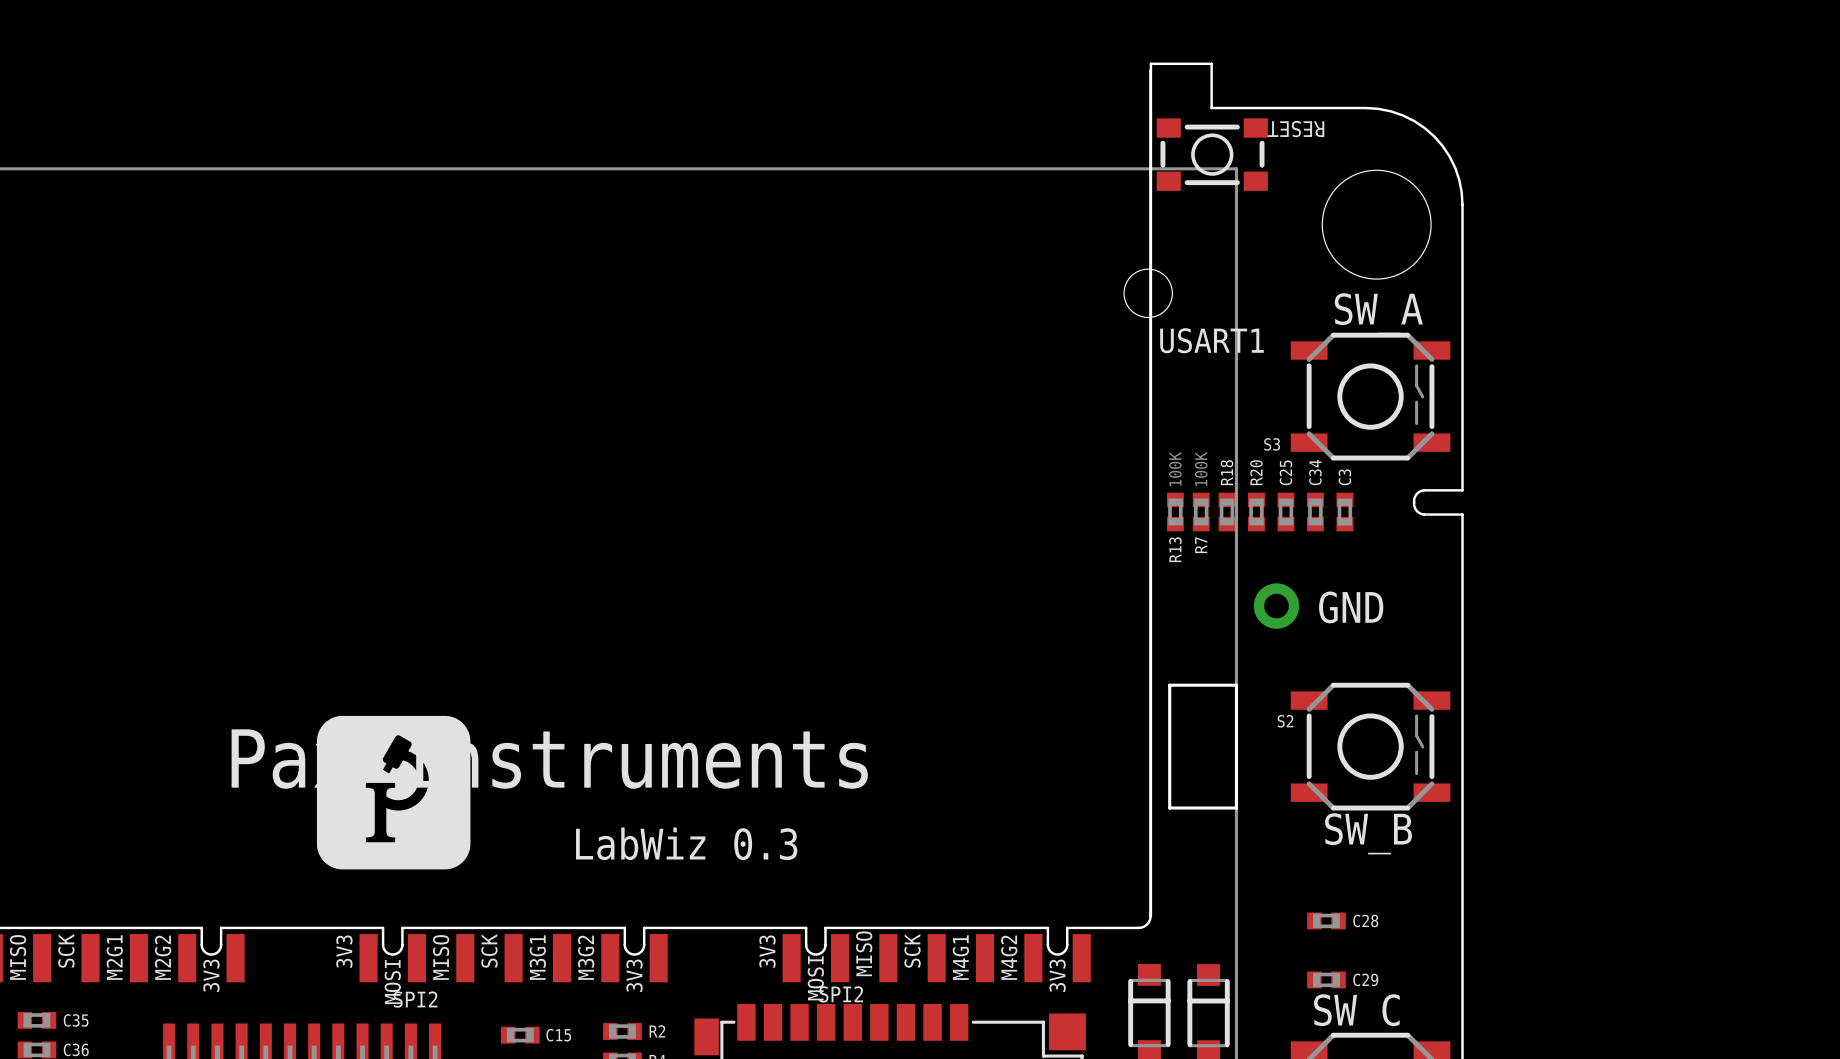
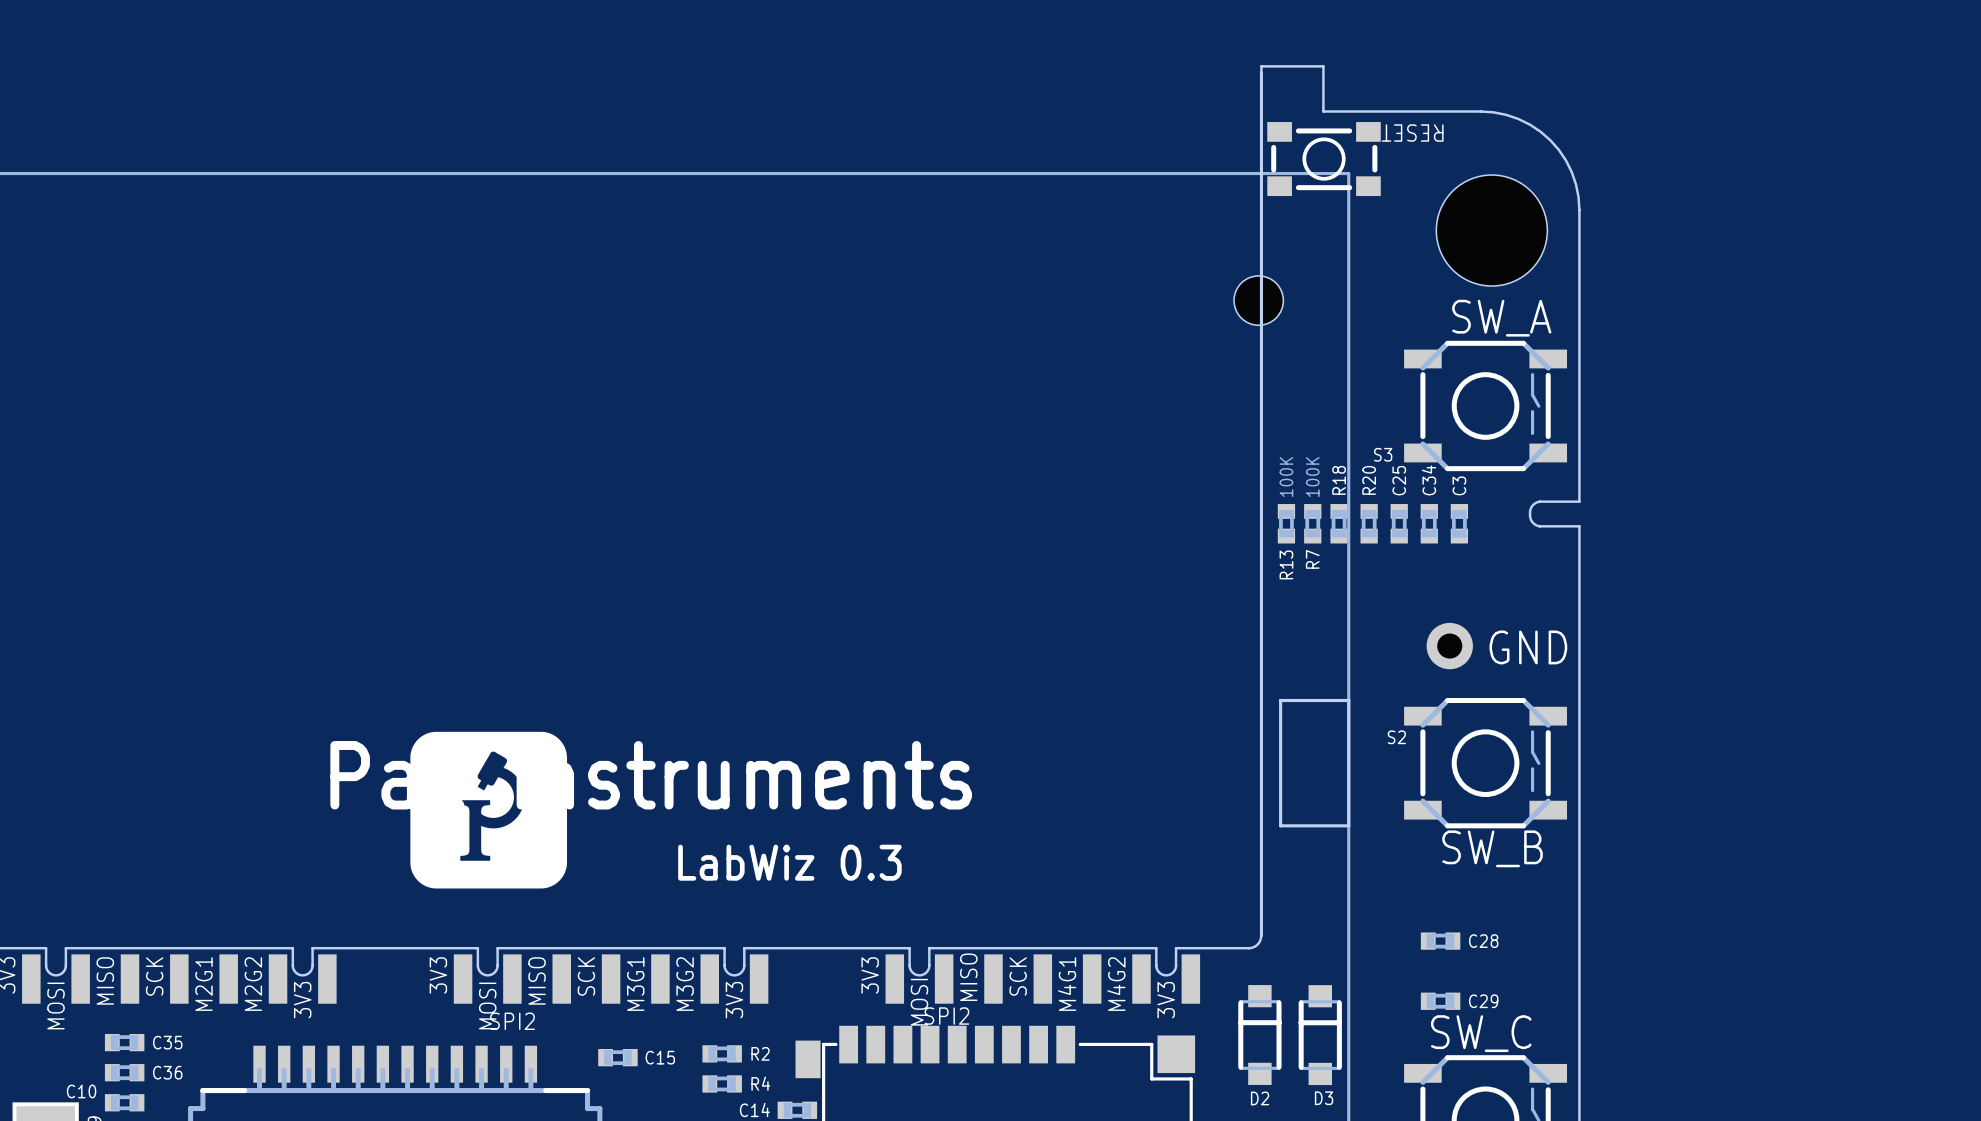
text: USART1 (1211, 340) -> none
part position: (1276, 606) -> (1449, 646)
text position: GND (1351, 607) -> GND (1528, 647)

